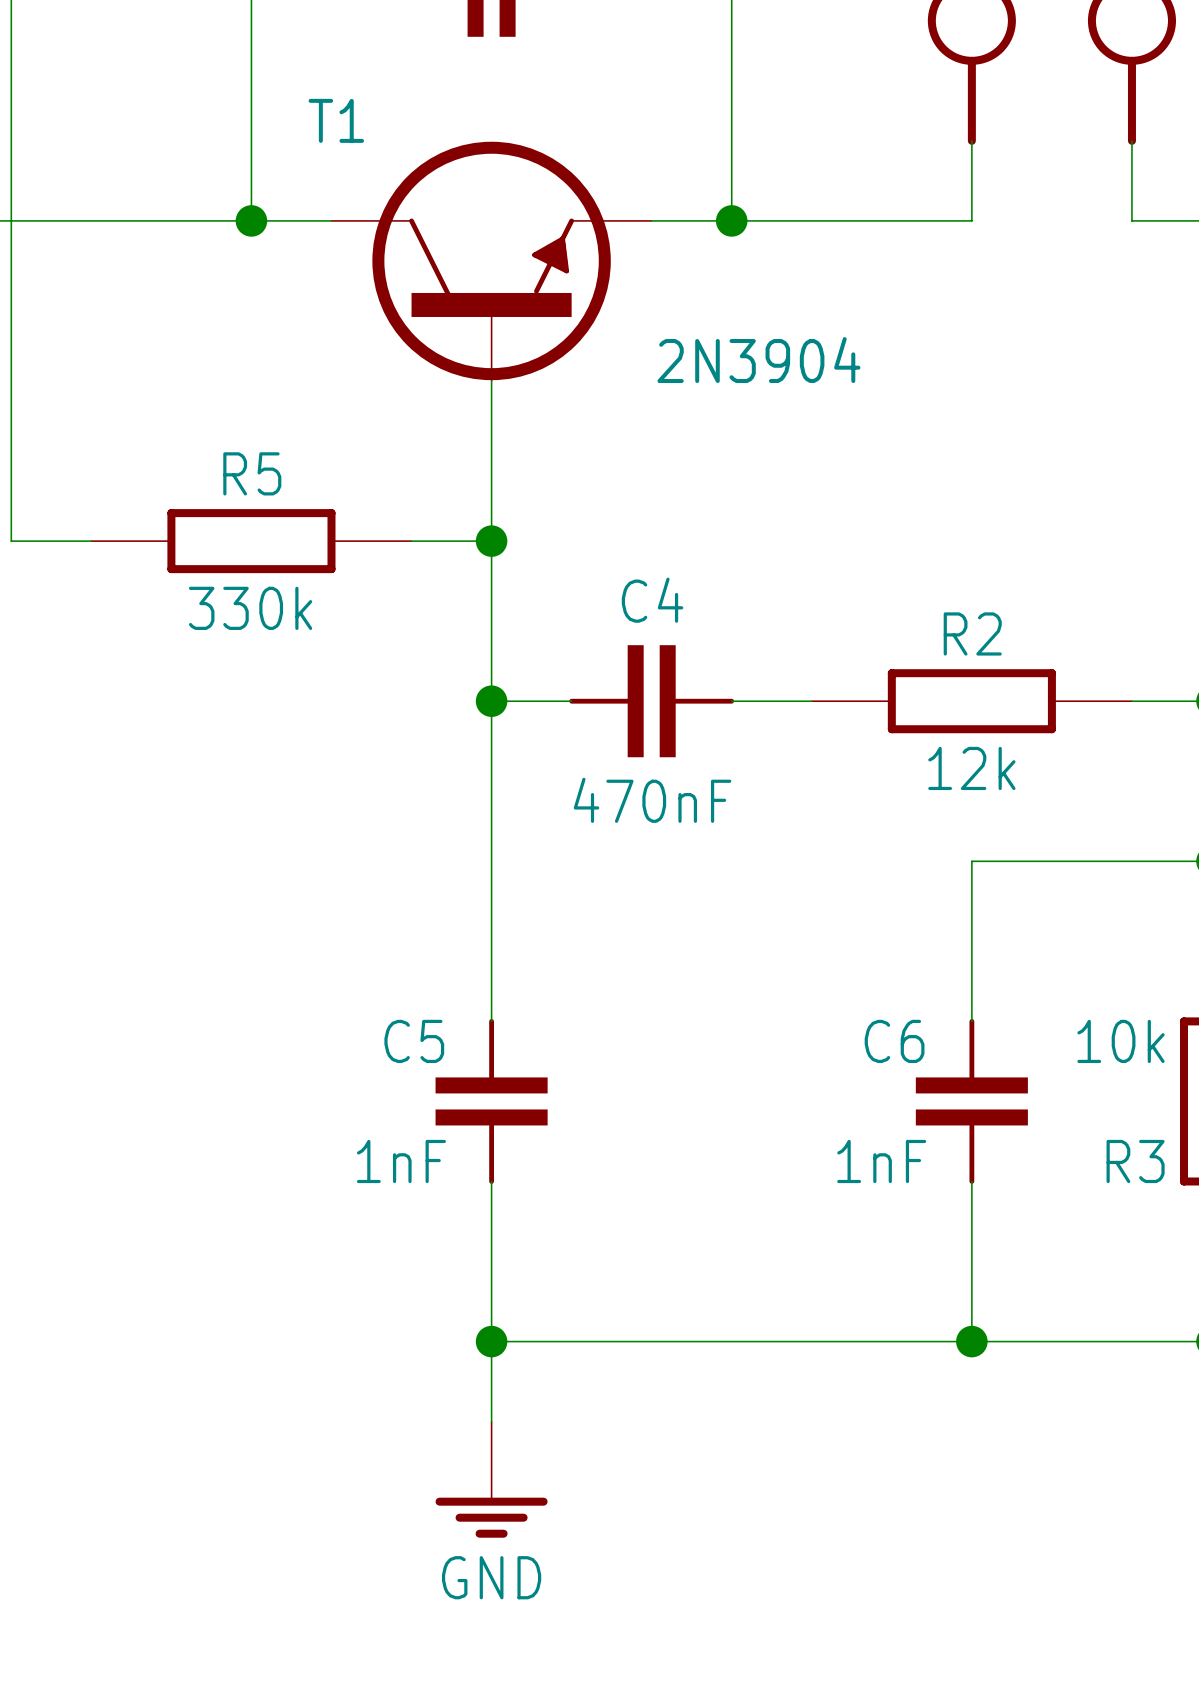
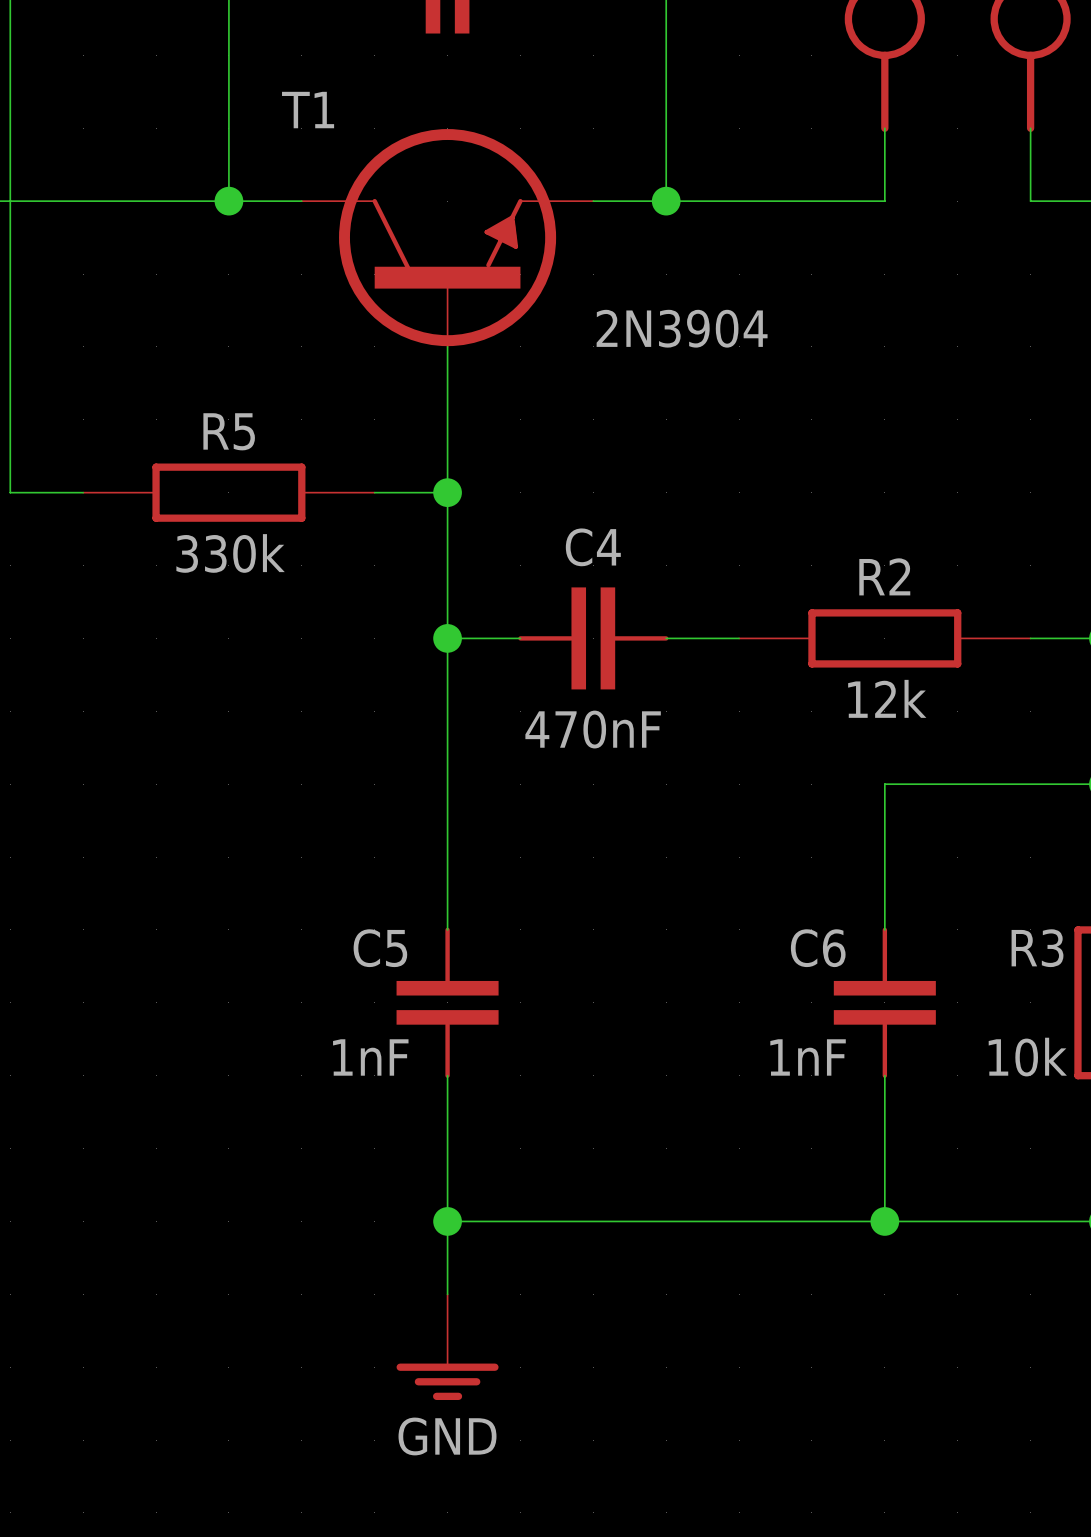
R3 value position: 10k (1121, 1041) -> 10k (1027, 1057)
R3 name position: R3 (1135, 1161) -> R3 (1037, 948)

